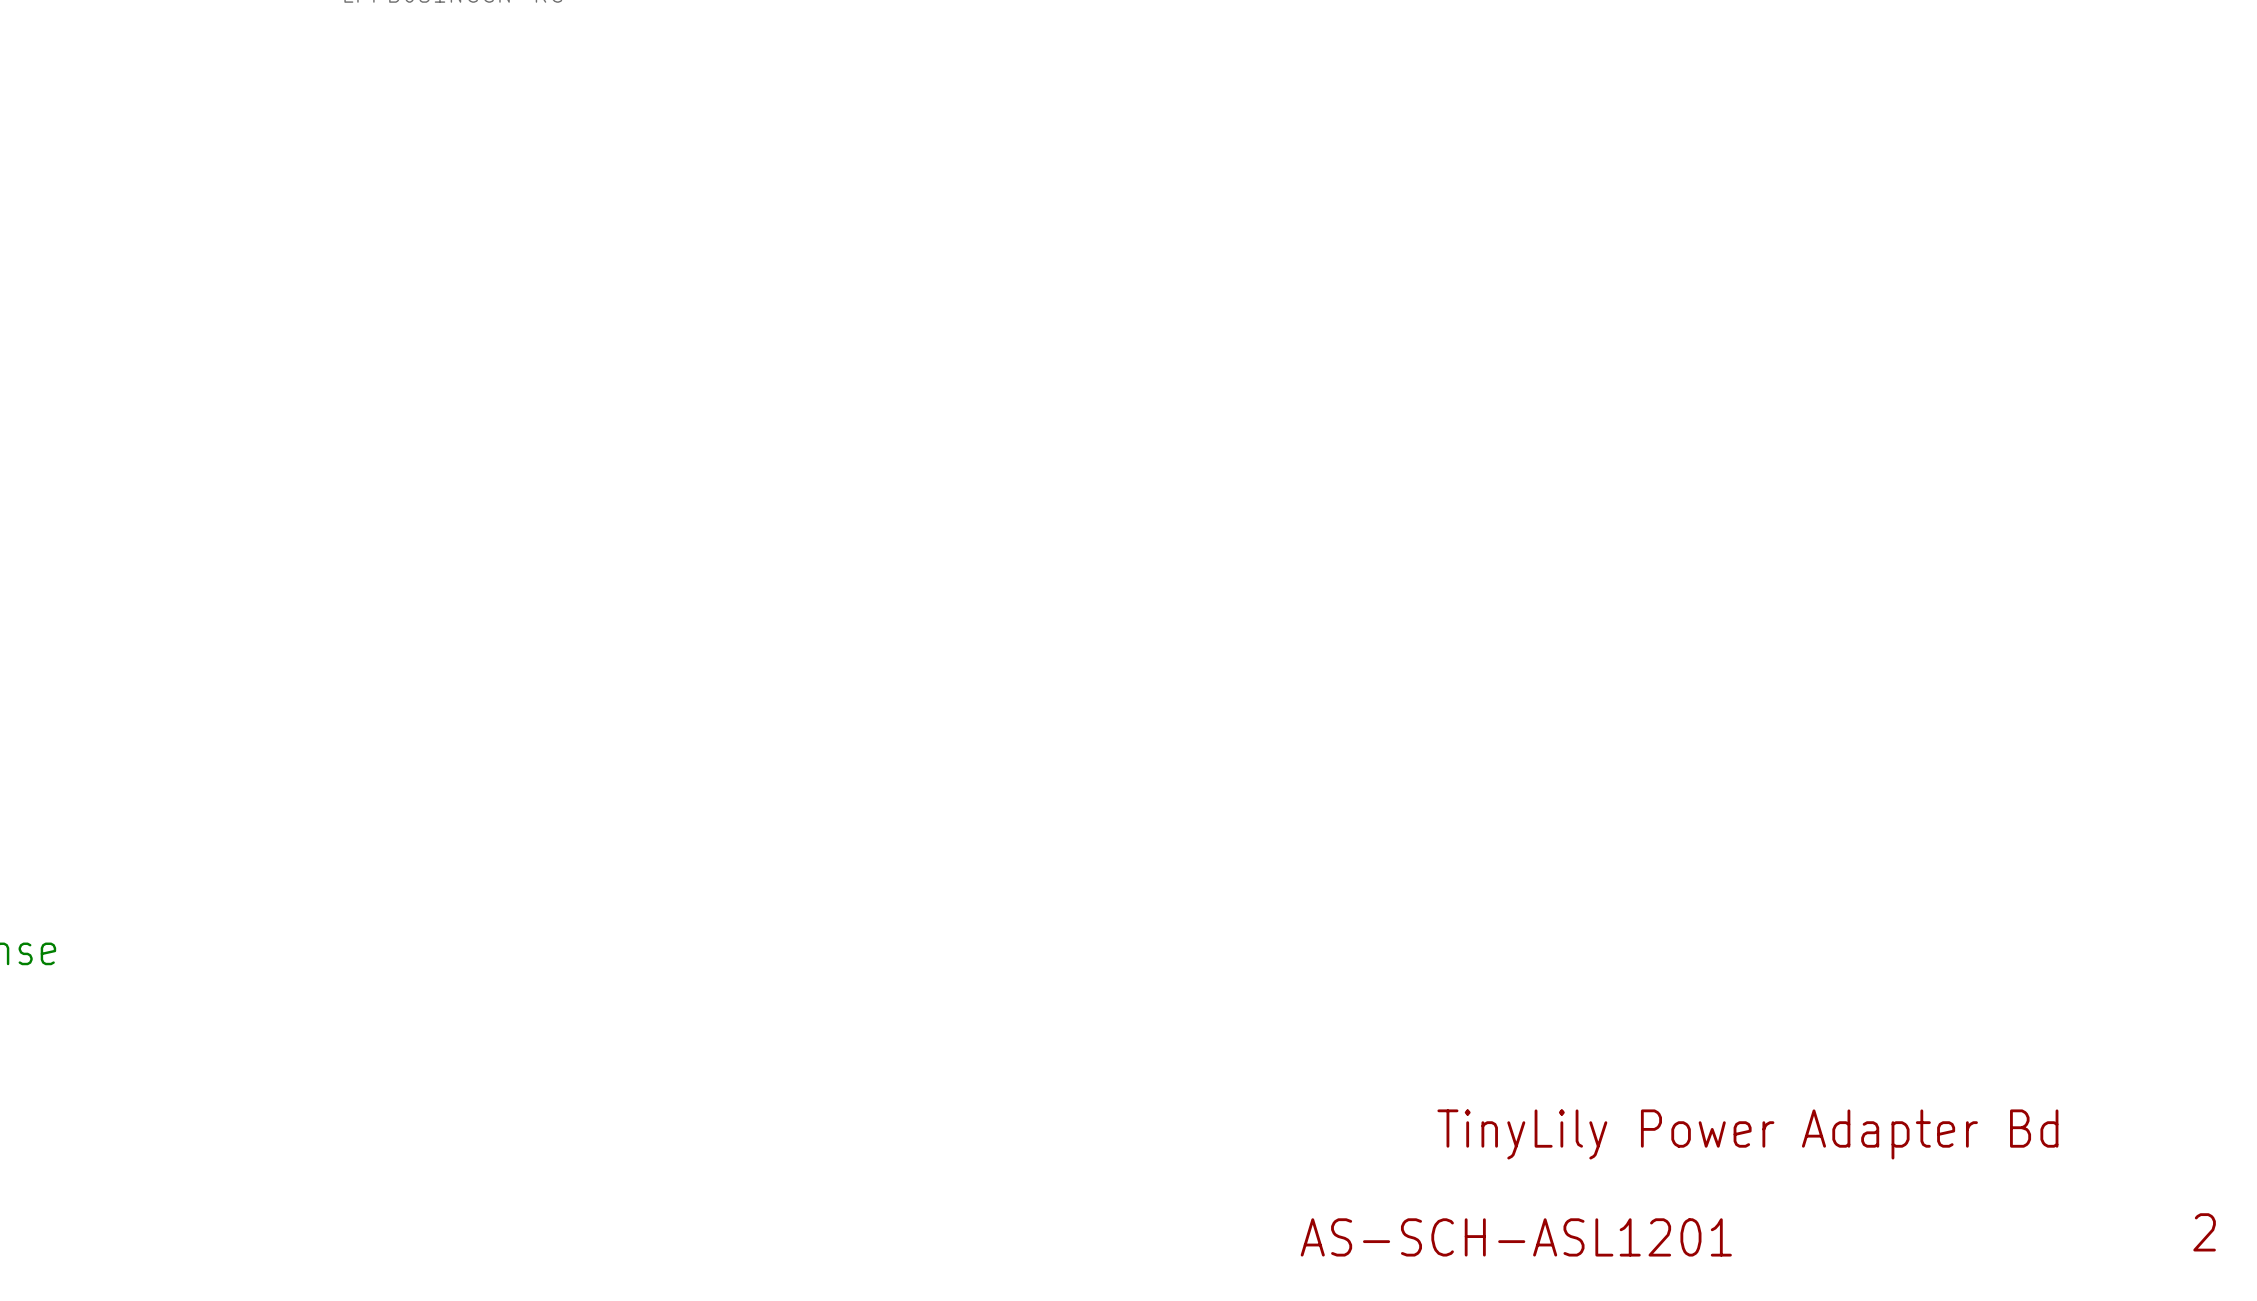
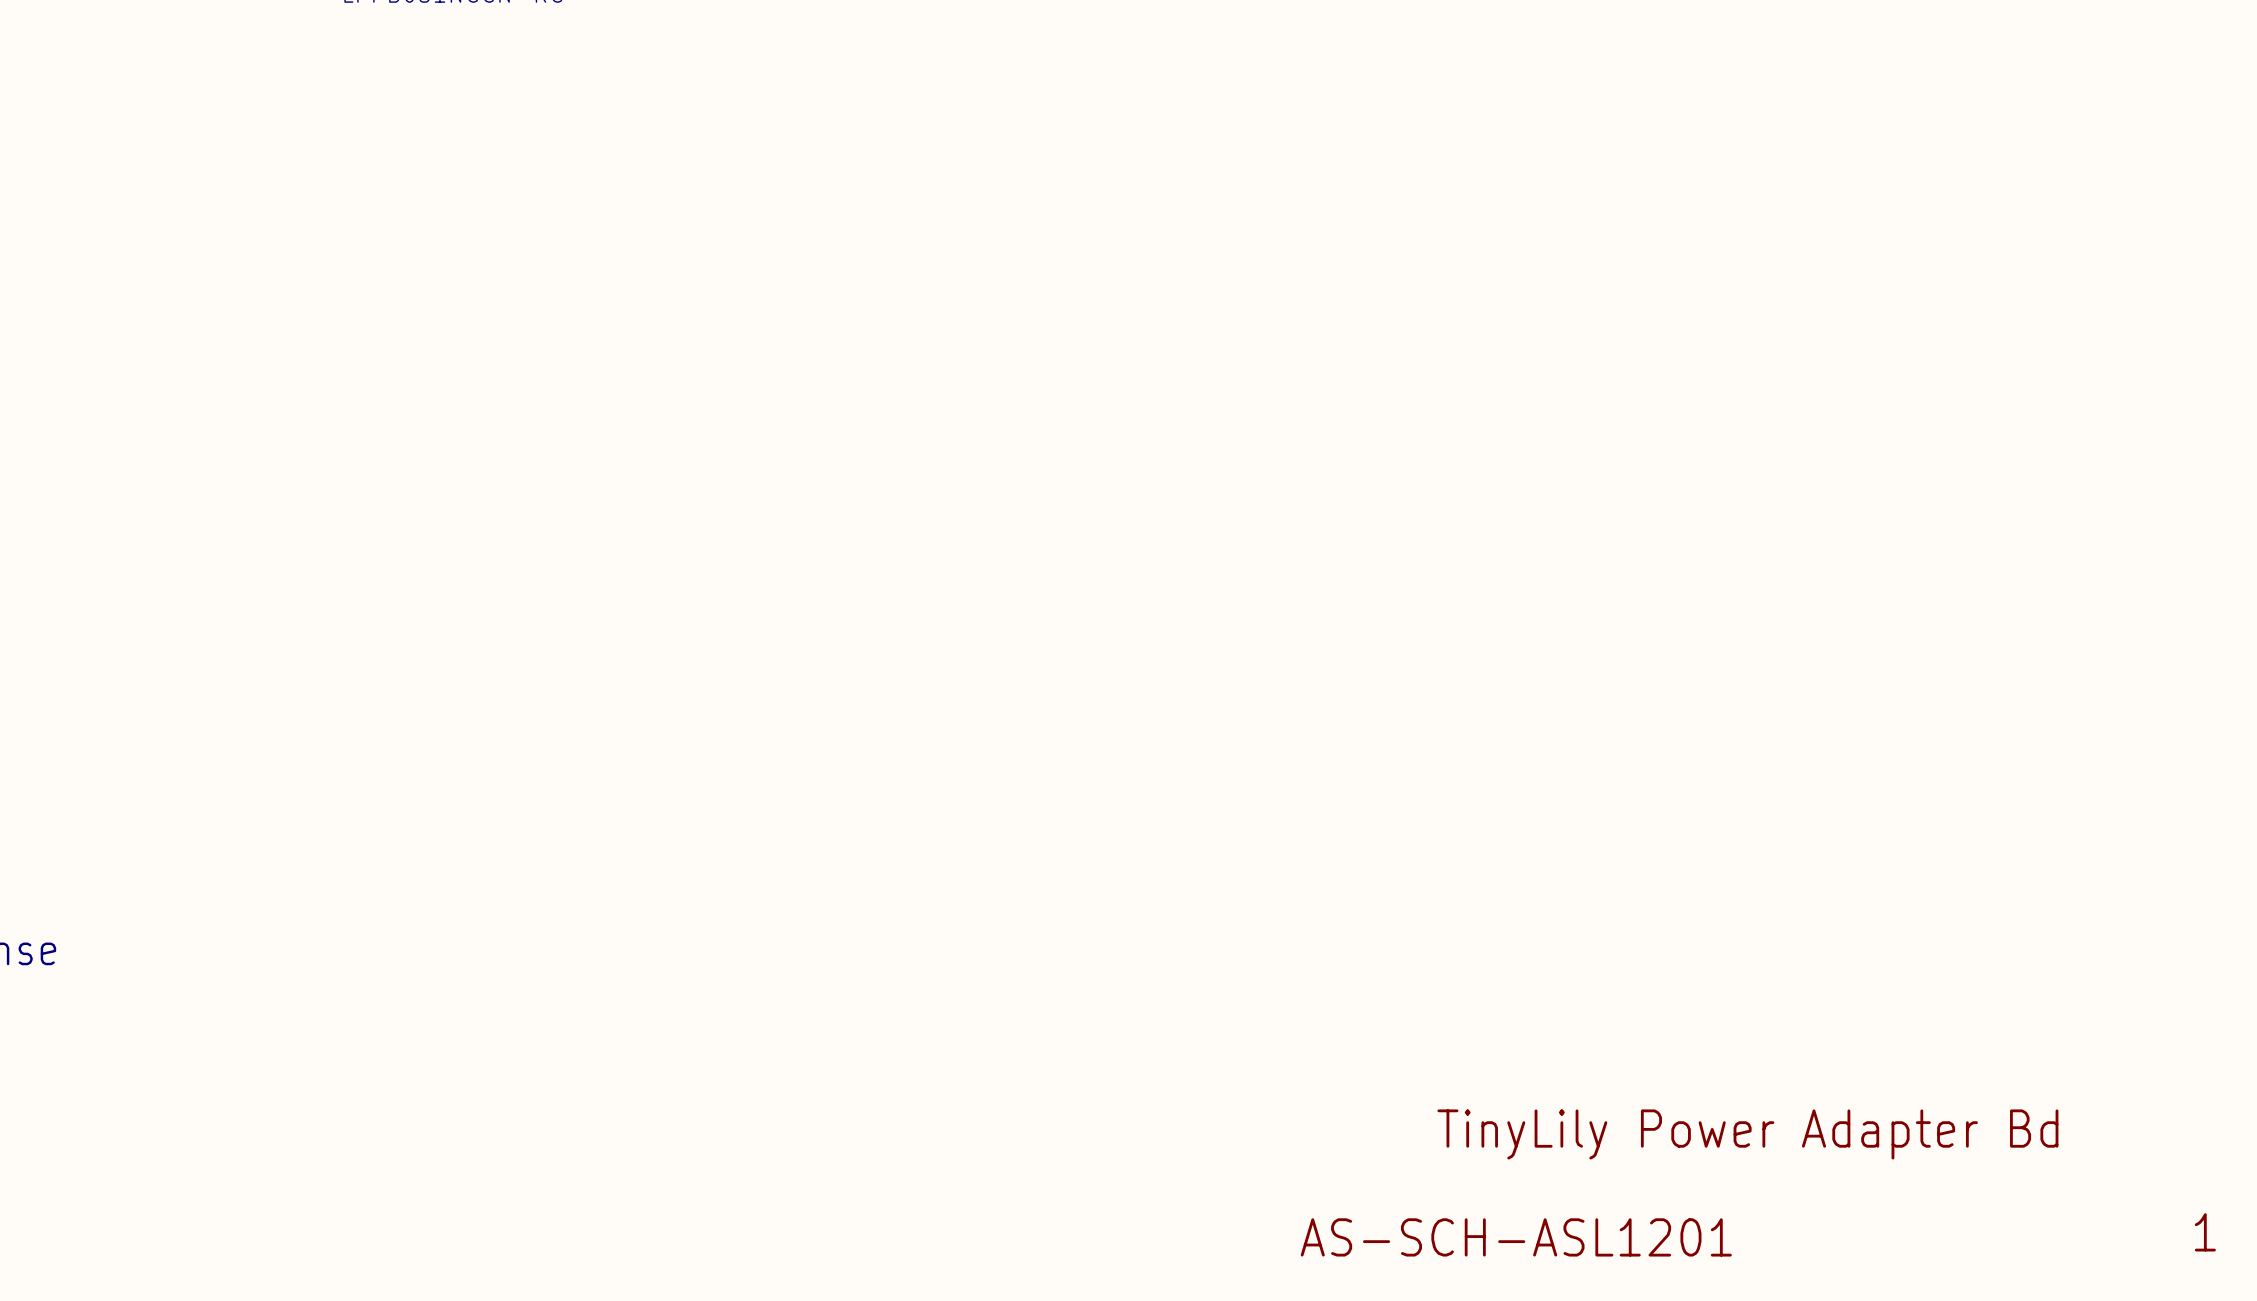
text: 2 (2204, 1232) -> 1 (2205, 1232)

